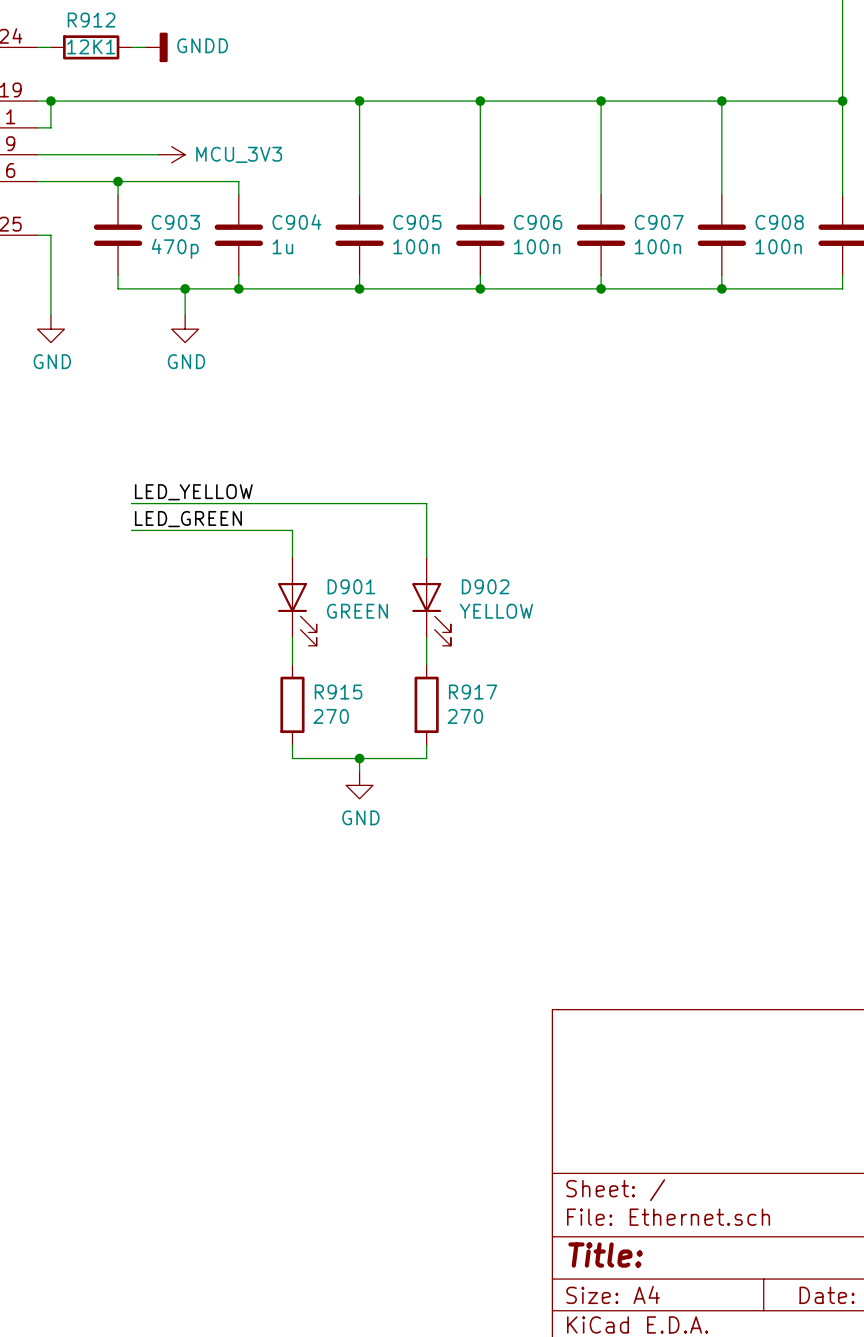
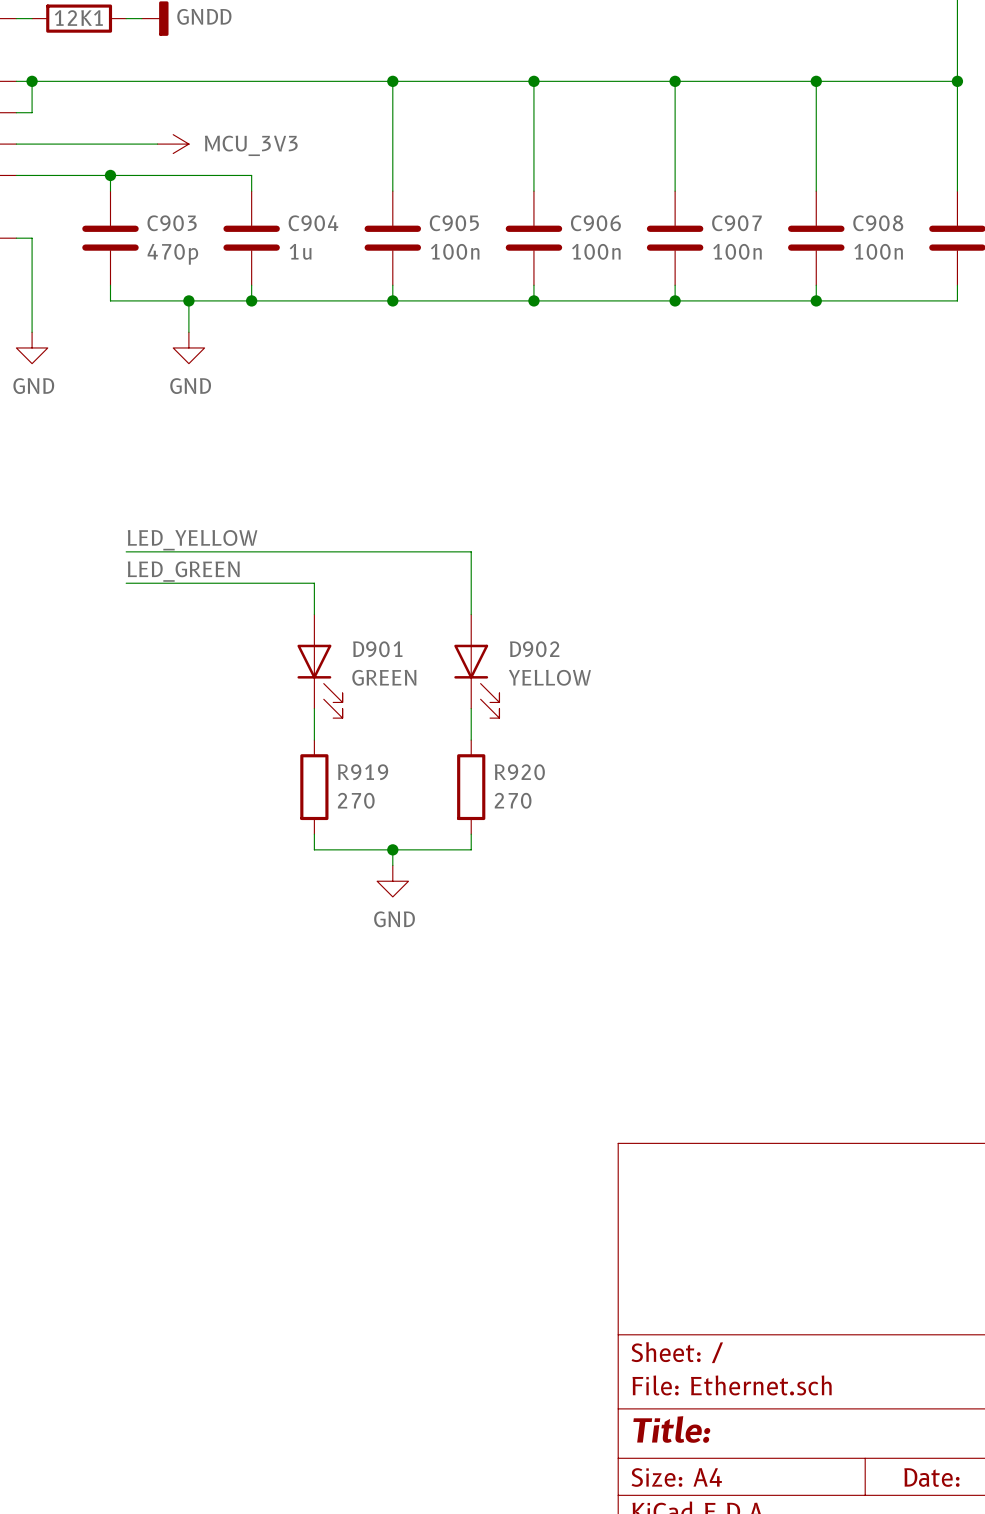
R915 name: R915 (338, 692) -> R919 (363, 772)
R917 name: R917 (473, 692) -> R920 (519, 772)

